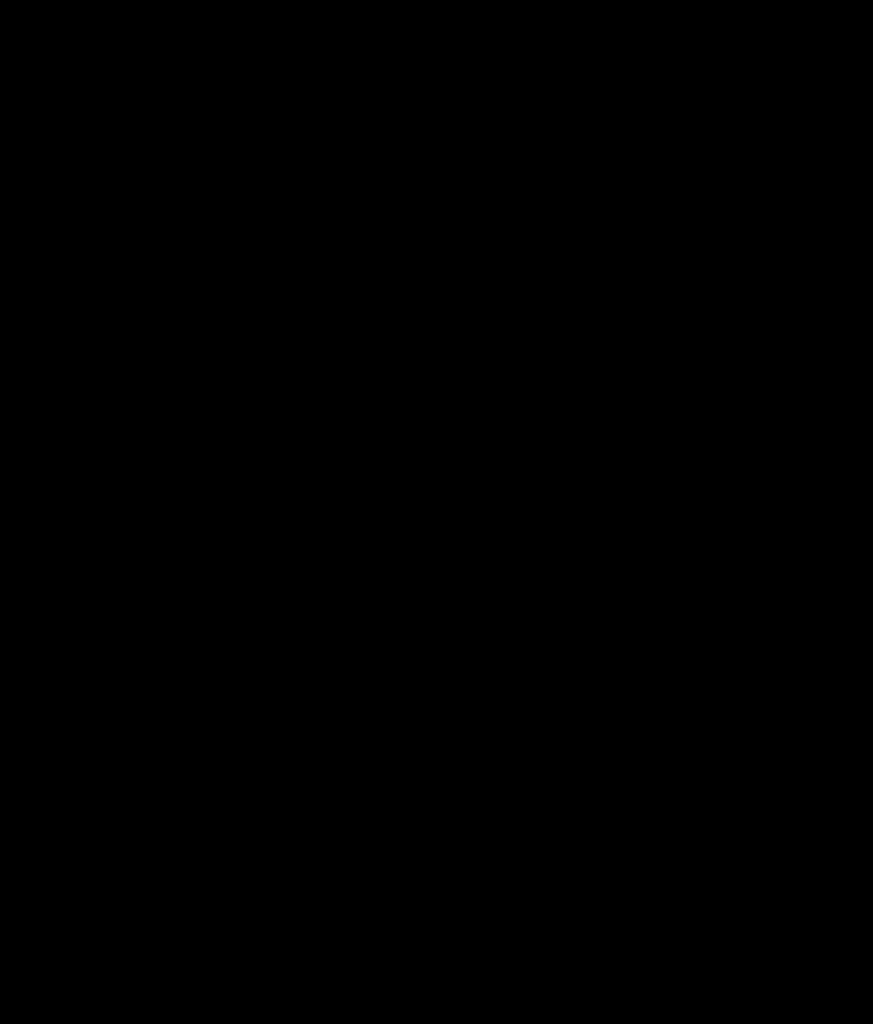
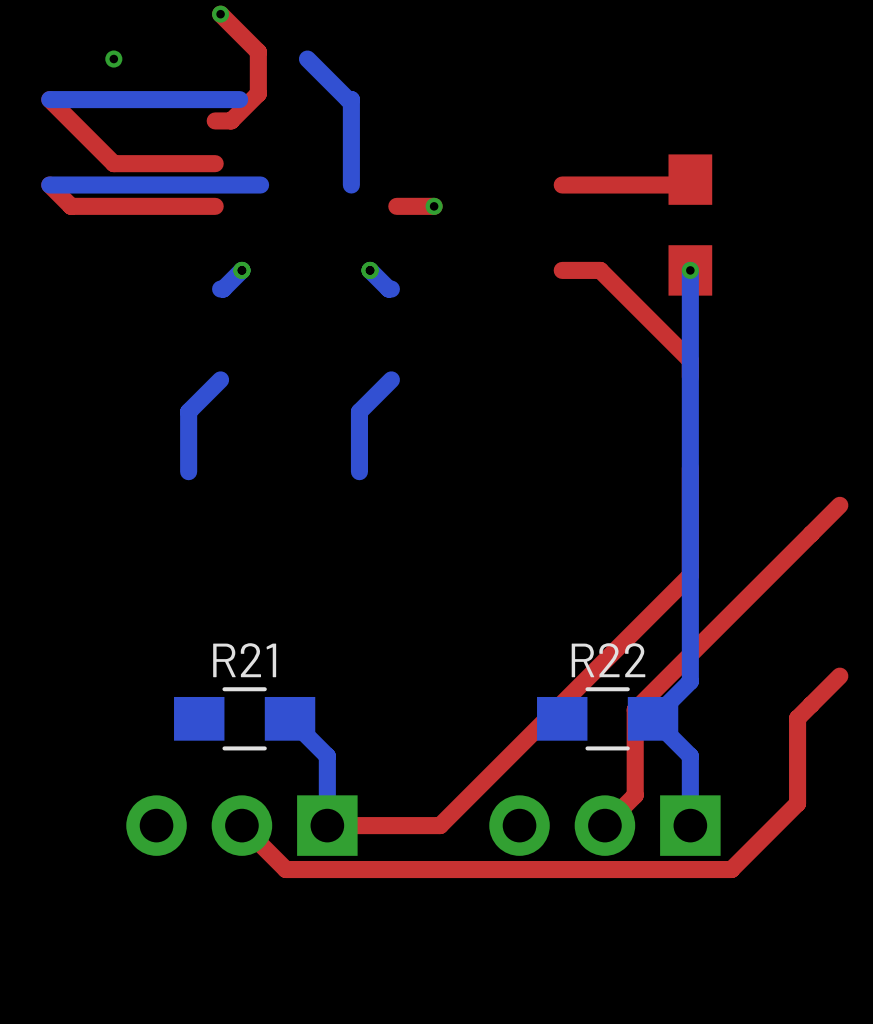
top track: none -> (220, 14) (258, 51) (258, 93) (231, 120) (215, 120)
via: none -> (220, 14)
via: none -> (113, 59)
bottom track: none -> (307, 59) (348, 99) (351, 99) (351, 185)
top track: none -> (49, 99) (113, 163) (215, 163)
bottom track: none -> (239, 99) (49, 99)
top track: none -> (690, 179) (684, 185) (562, 185)
top track: none -> (49, 185) (71, 206) (215, 206)
bottom track: none -> (260, 185) (49, 185)
top track: none -> (434, 206) (396, 206)
via: none -> (434, 206)
part: none -> (690, 225)
bottom track: none -> (241, 270) (223, 289) (220, 289)
via: none -> (241, 270)
bottom track: none -> (370, 270) (388, 289) (391, 289)
via: none -> (370, 270)
top track: none -> (562, 270) (600, 270) (690, 360) (690, 377)
bottom track: none -> (690, 270) (690, 681) (653, 718) (690, 756) (690, 825)
via: none -> (690, 270)
bottom track: none -> (220, 379) (188, 411) (188, 471)
bottom track: none -> (391, 379) (359, 411) (359, 471)
top track: none -> (690, 467) (690, 575) (440, 825) (327, 825)
top track: none -> (839, 505) (635, 709) (635, 795) (604, 825)
top track: none -> (839, 676) (797, 718) (797, 803) (731, 869) (285, 869) (241, 825)
R21: none -> (244, 718)
bottom track: none -> (290, 718) (327, 756) (327, 825)
R22: none -> (607, 718)
part: none -> (241, 825)
part: none -> (604, 825)

